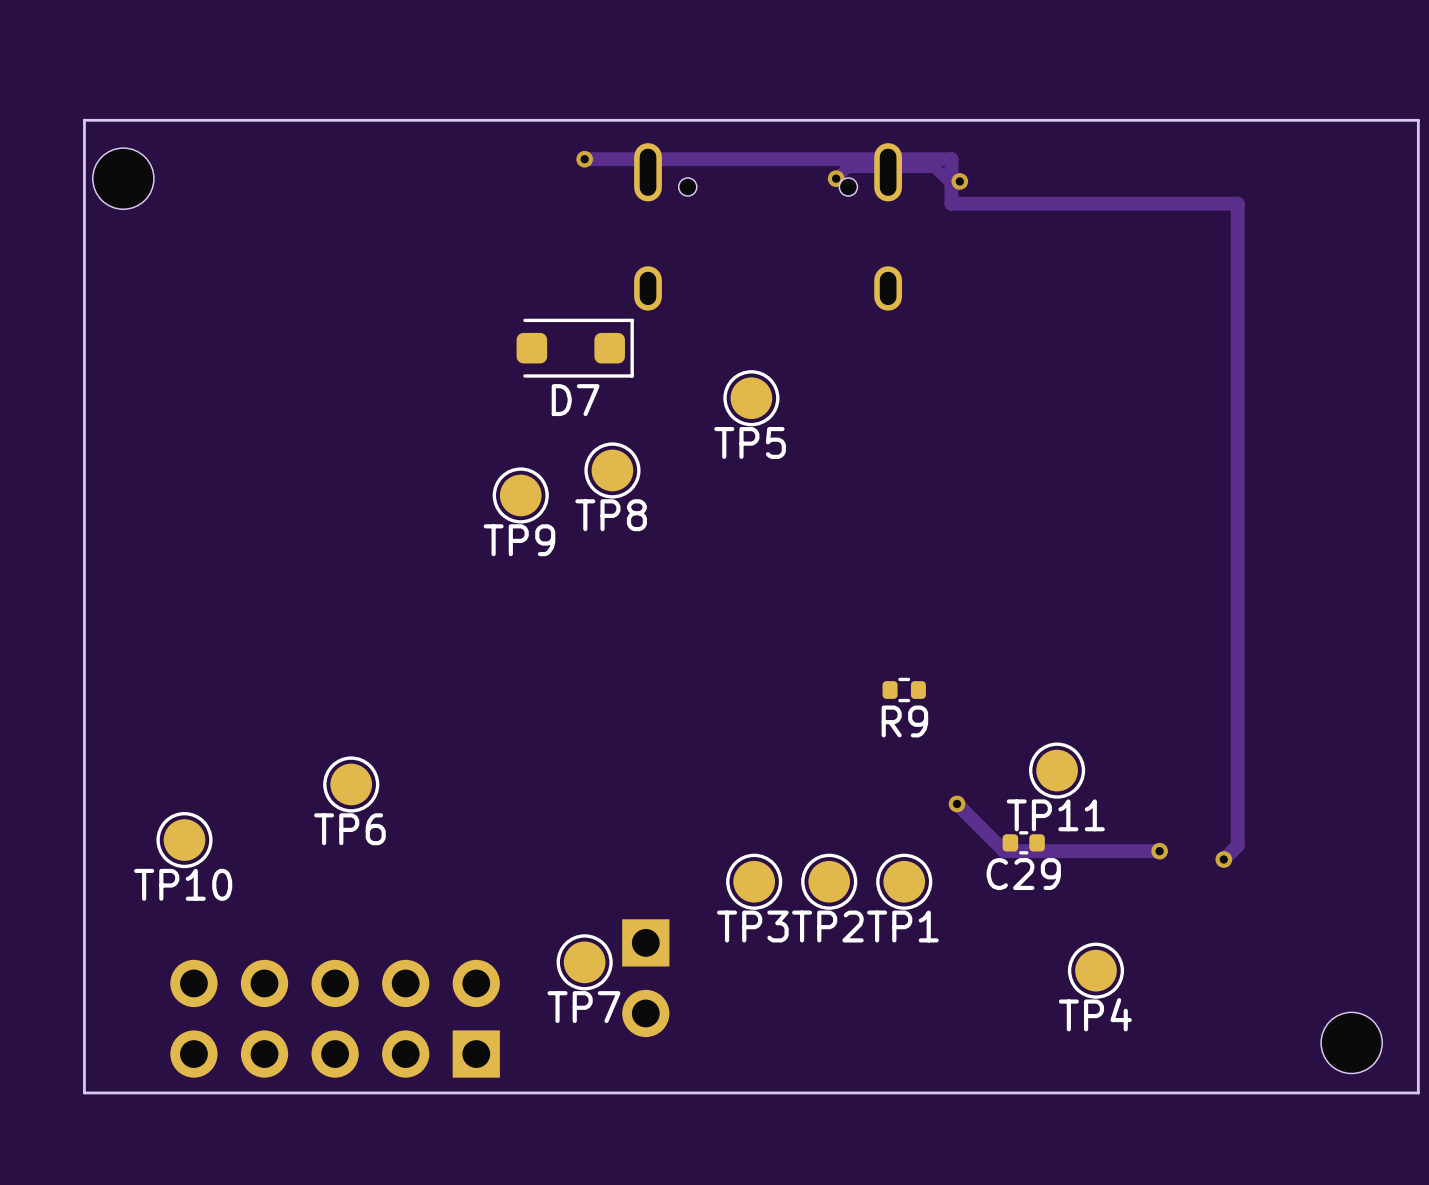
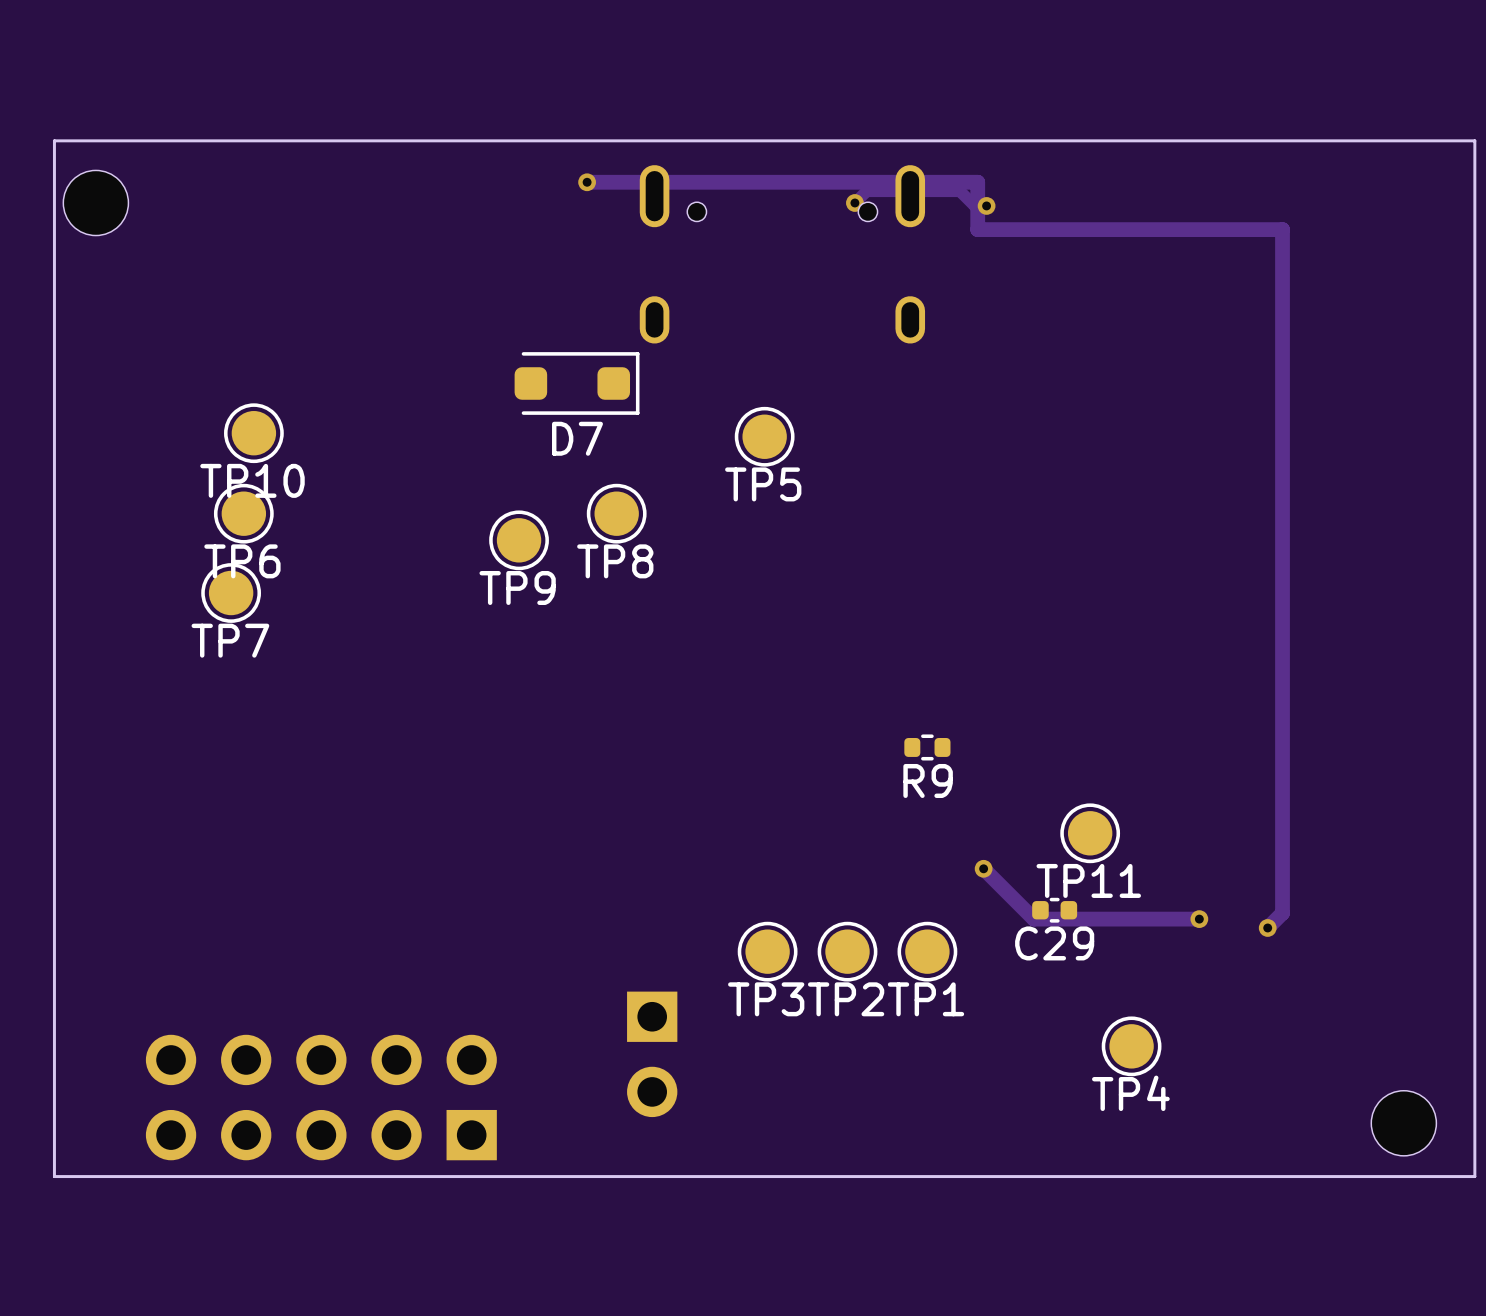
TP6 position: (351, 784) -> (243, 513)
TP10 position: (184, 840) -> (253, 433)
TP7 position: (584, 962) -> (231, 593)

